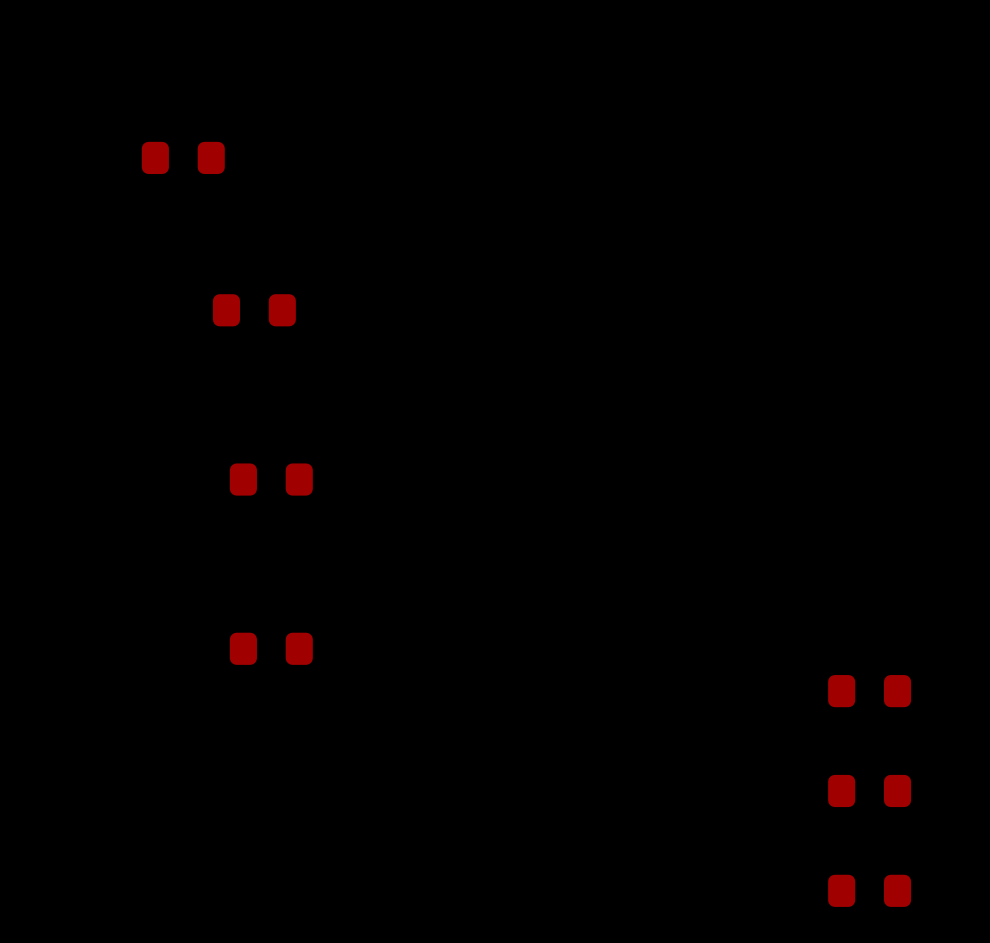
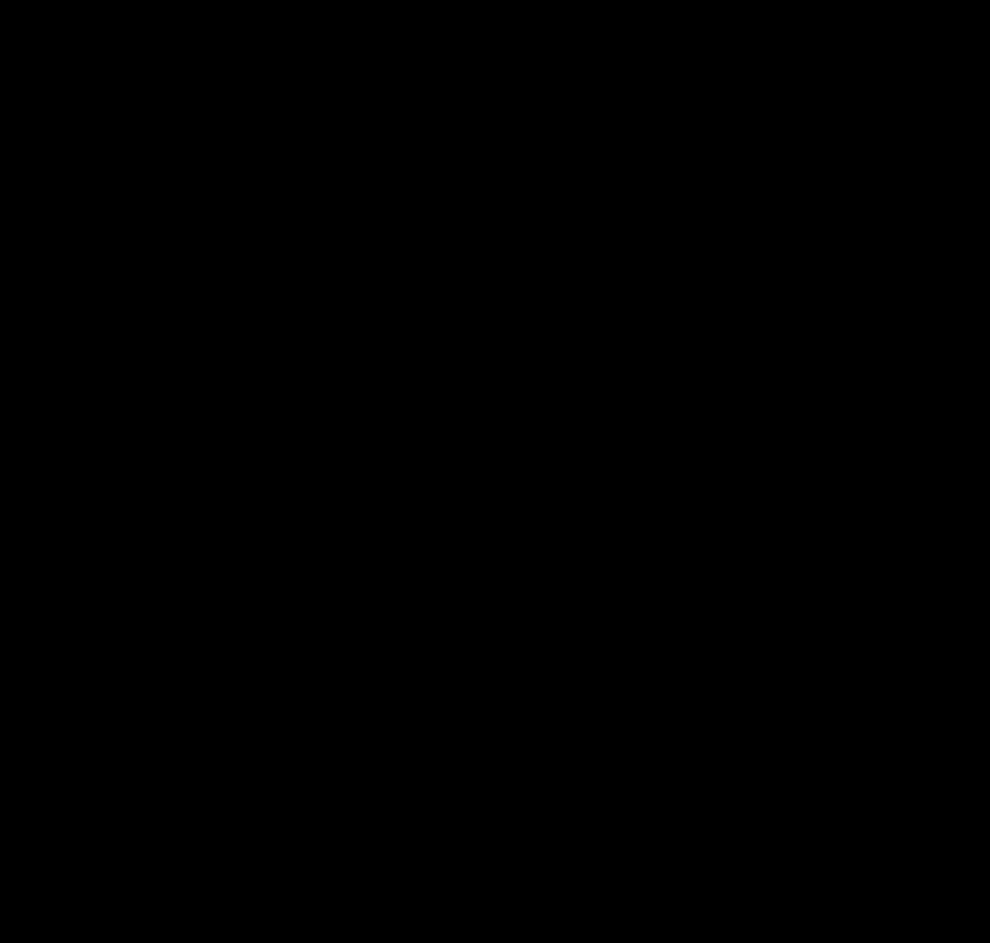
part: (183, 157) -> none
part: (254, 310) -> none
part: (271, 479) -> none
part: (271, 648) -> none
part: (869, 691) -> none
part: (869, 790) -> none
part: (869, 890) -> none

